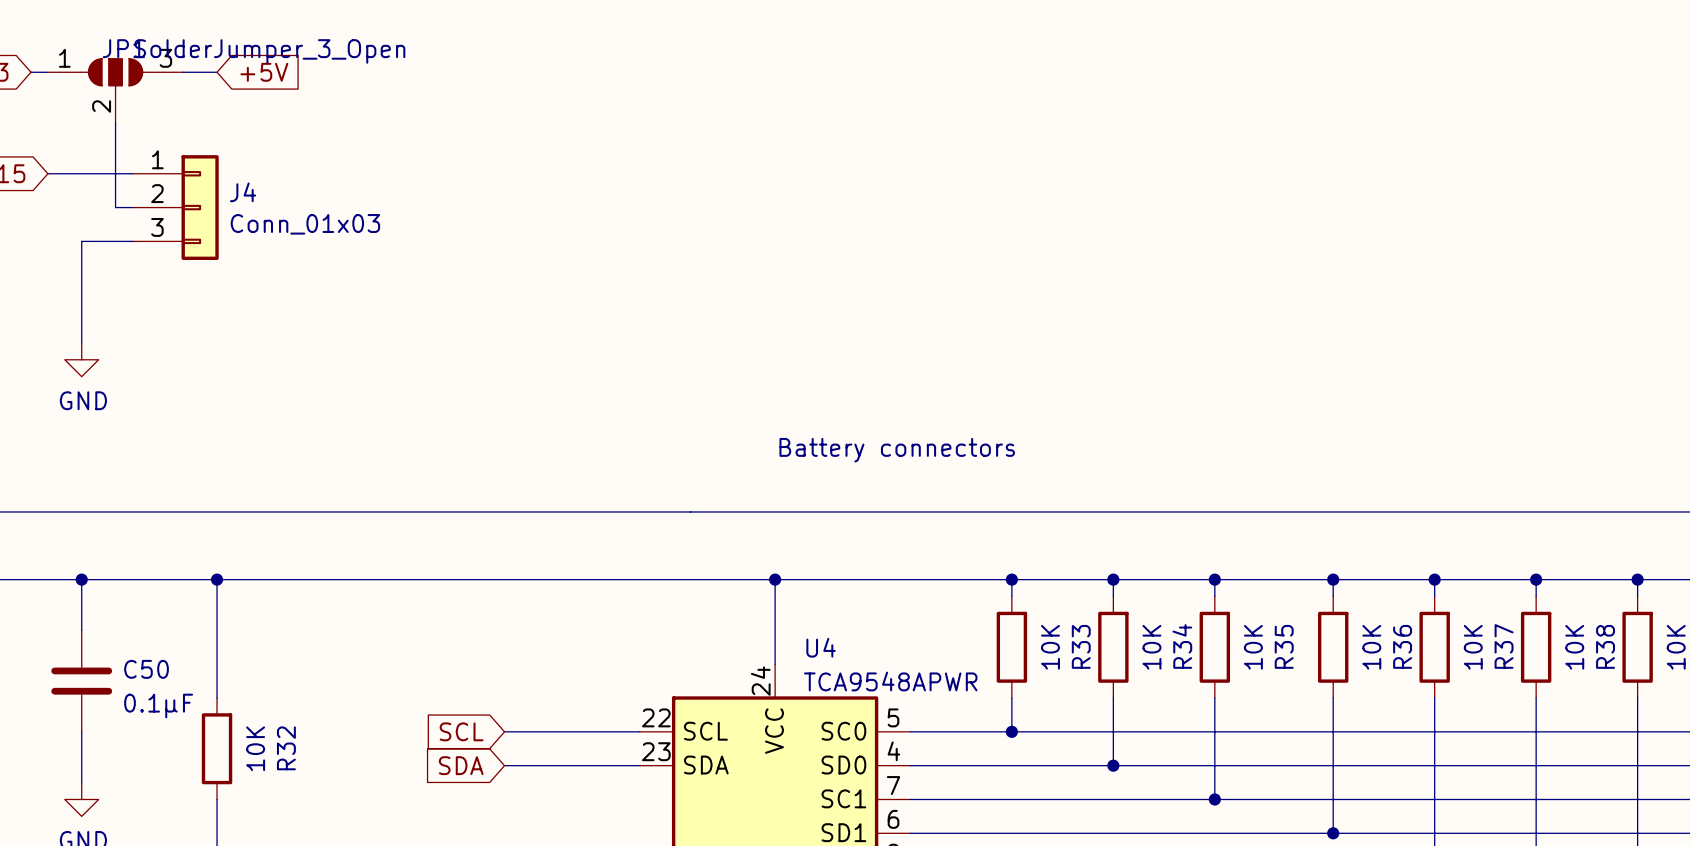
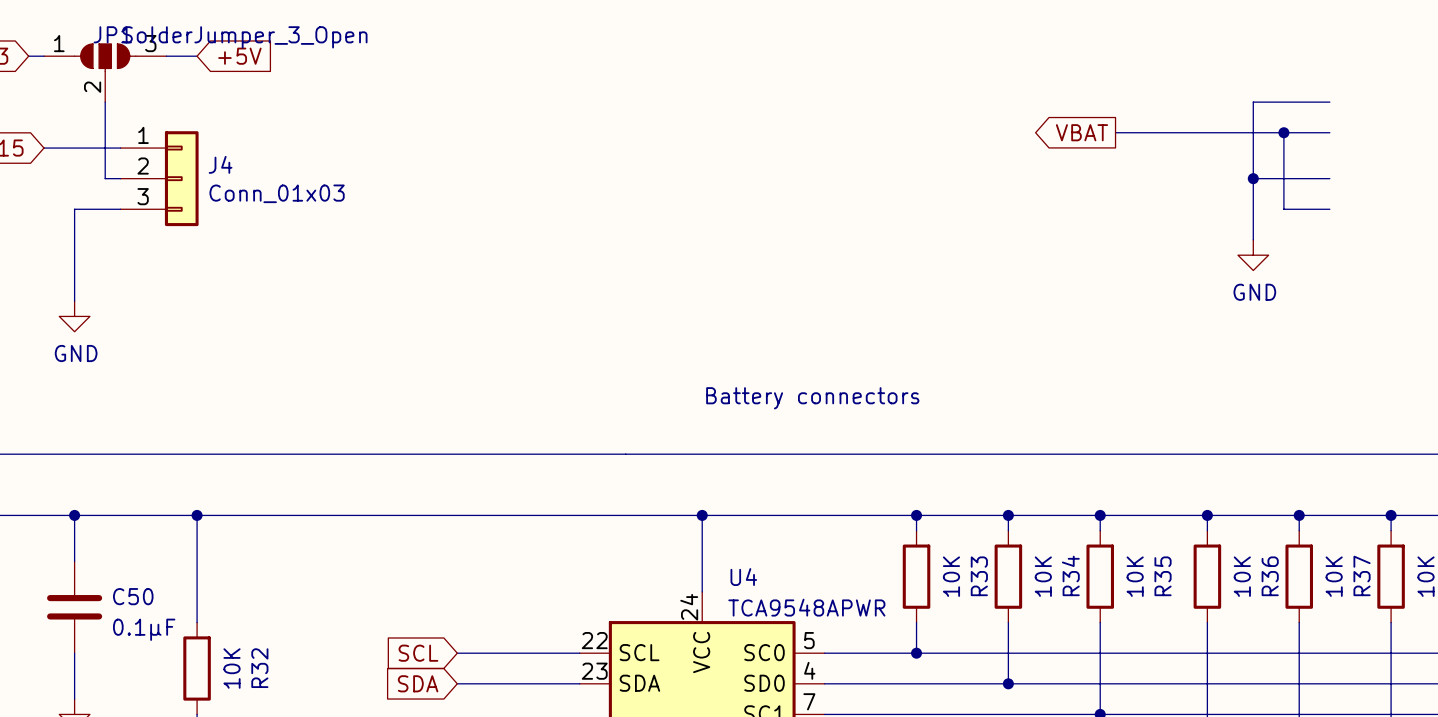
wire: none -> (1329, 102) (1253, 102) (1253, 239)
global label: none -> VBAT (1081, 132)
wire: none -> (1115, 132) (1329, 132)
wire: none -> (1283, 132) (1283, 209) (1329, 209)
junction: none -> (1283, 132)
wire: none -> (1253, 178) (1329, 178)
junction: none -> (1253, 178)
power symbol: none -> GND (1253, 255)

